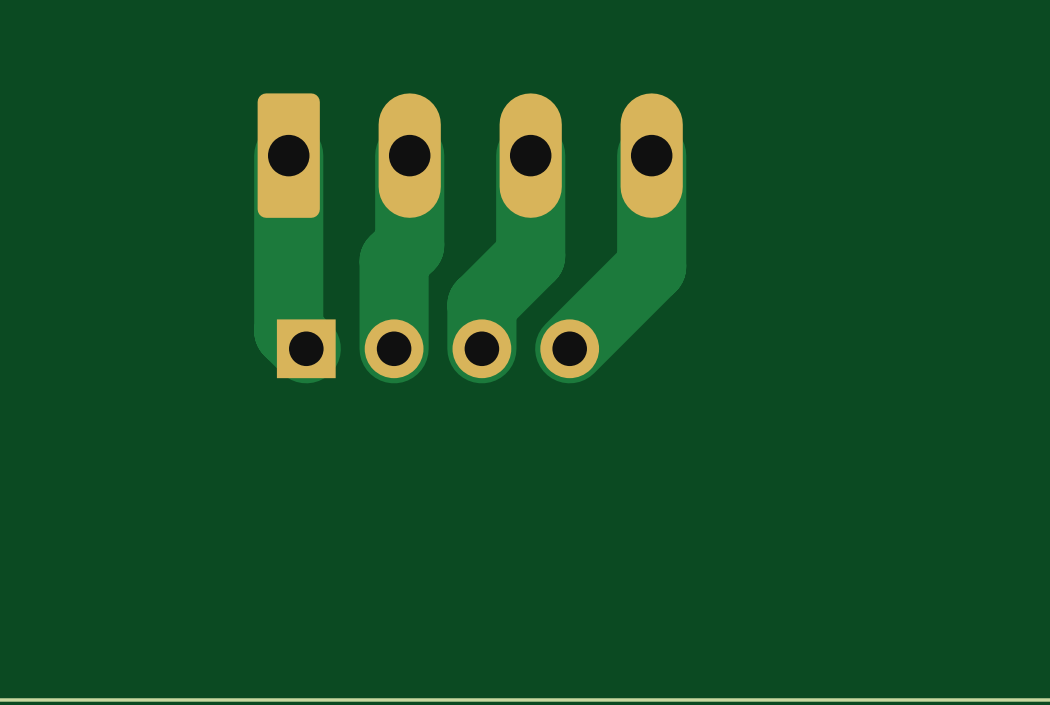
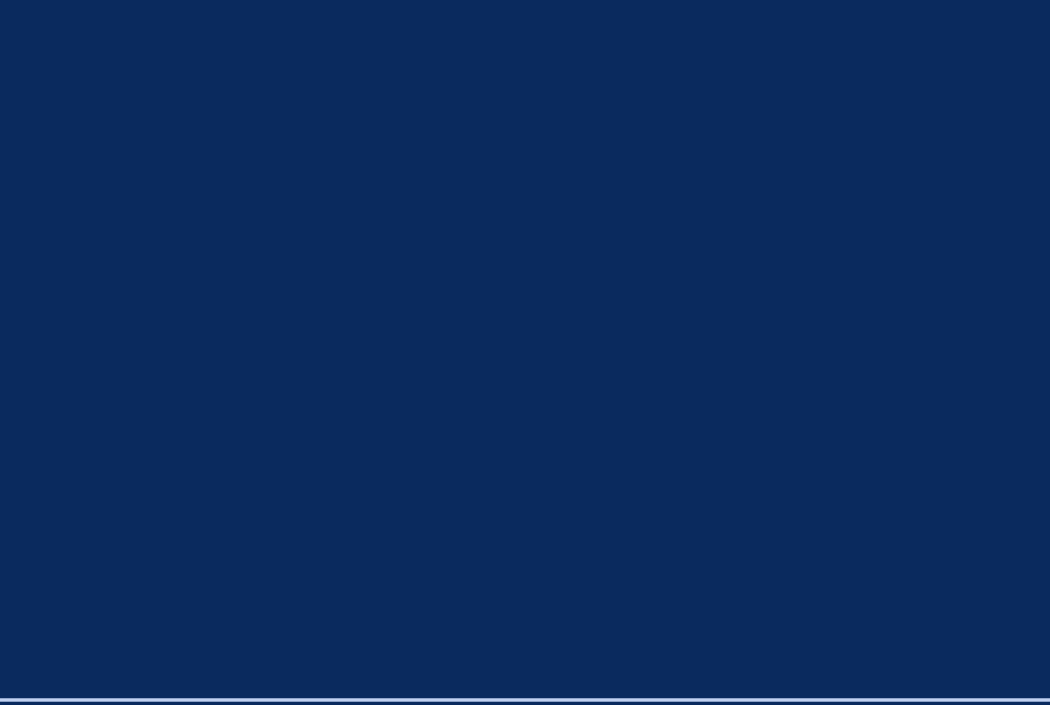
track: (288, 155) (288, 331) (306, 348) -> none
track: (409, 155) (409, 245) (394, 260) (394, 348) -> none
part: (470, 155) -> none
track: (530, 155) (530, 256) (481, 304) (481, 348) -> none
track: (651, 155) (651, 266) (569, 348) -> none
part: (437, 348) -> none

